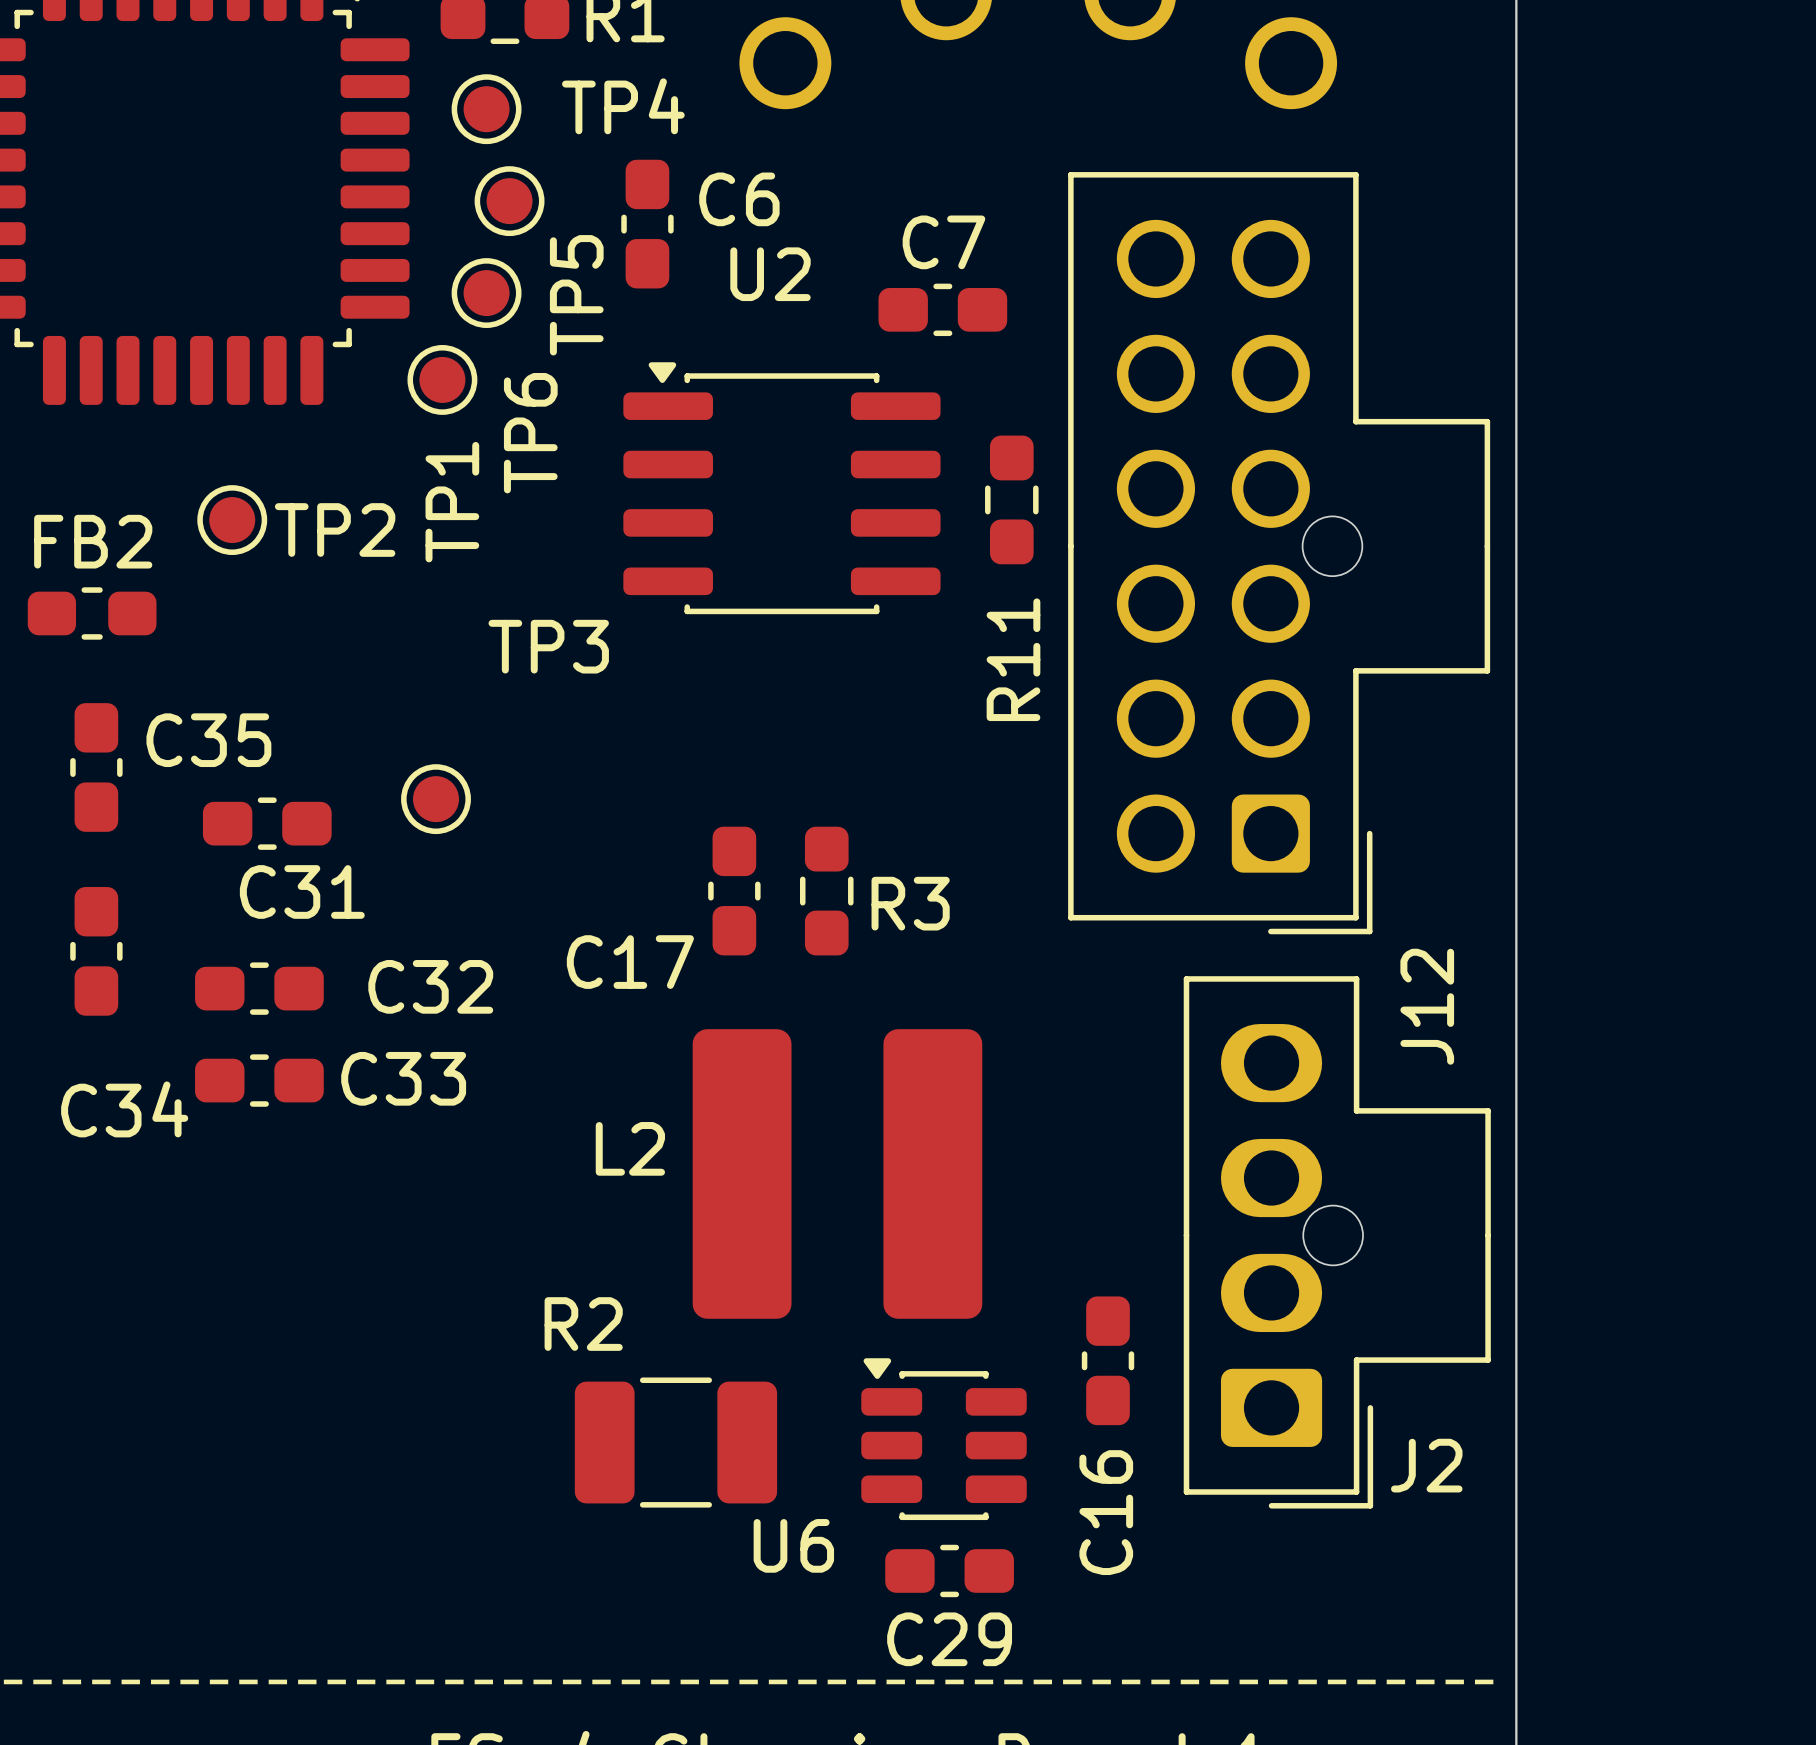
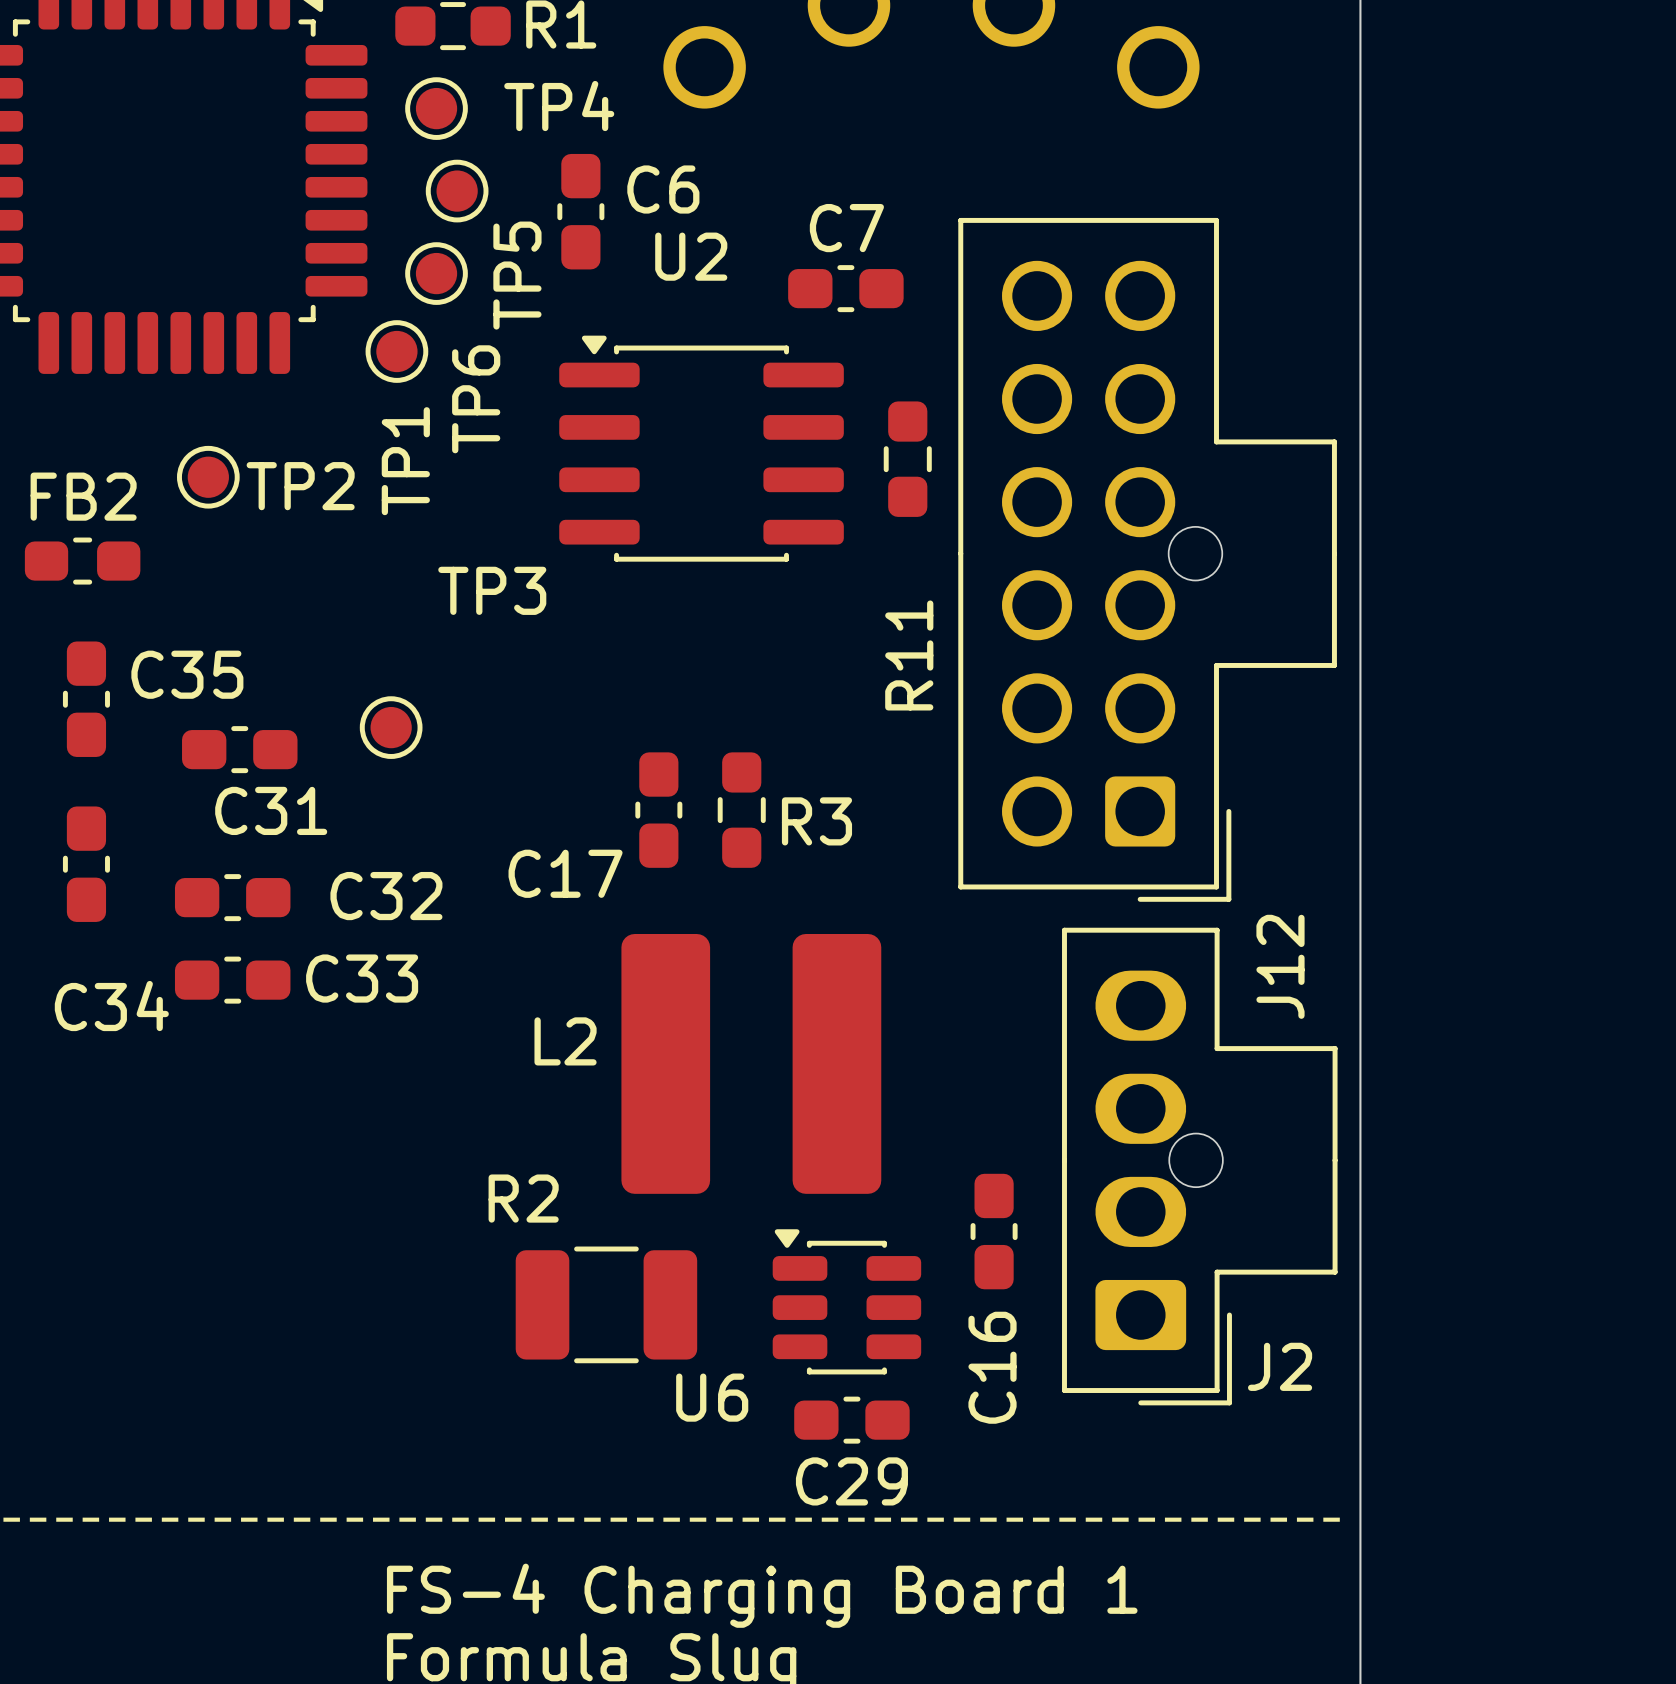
J12 position: (1279, 553) -> (1147, 559)
R11 name position: R11 (1013, 659) -> R11 (909, 655)
J2 position: (1337, 1242) -> (1199, 1166)

